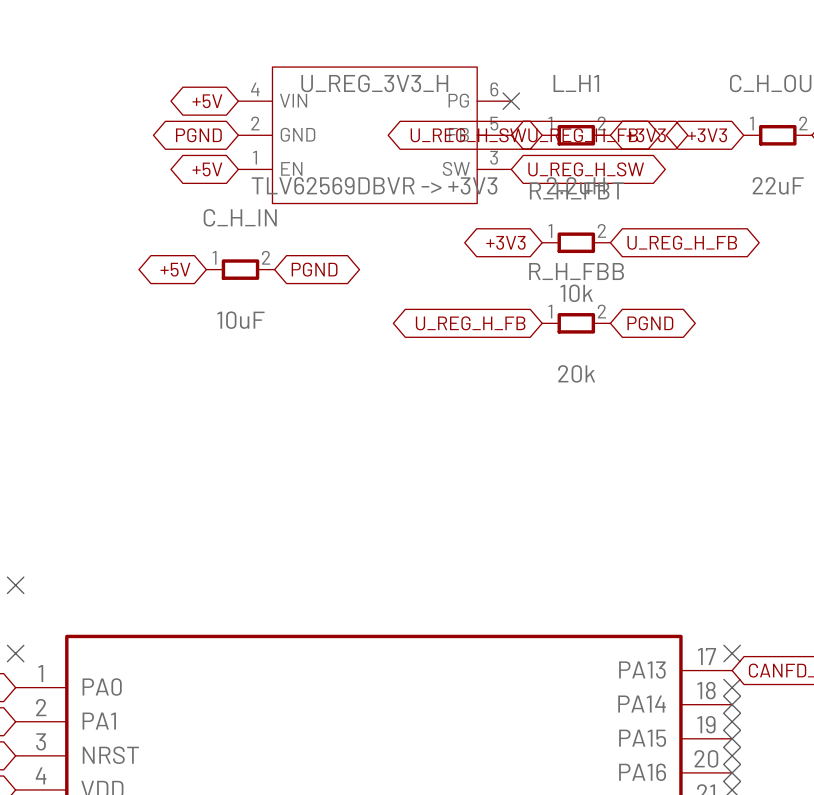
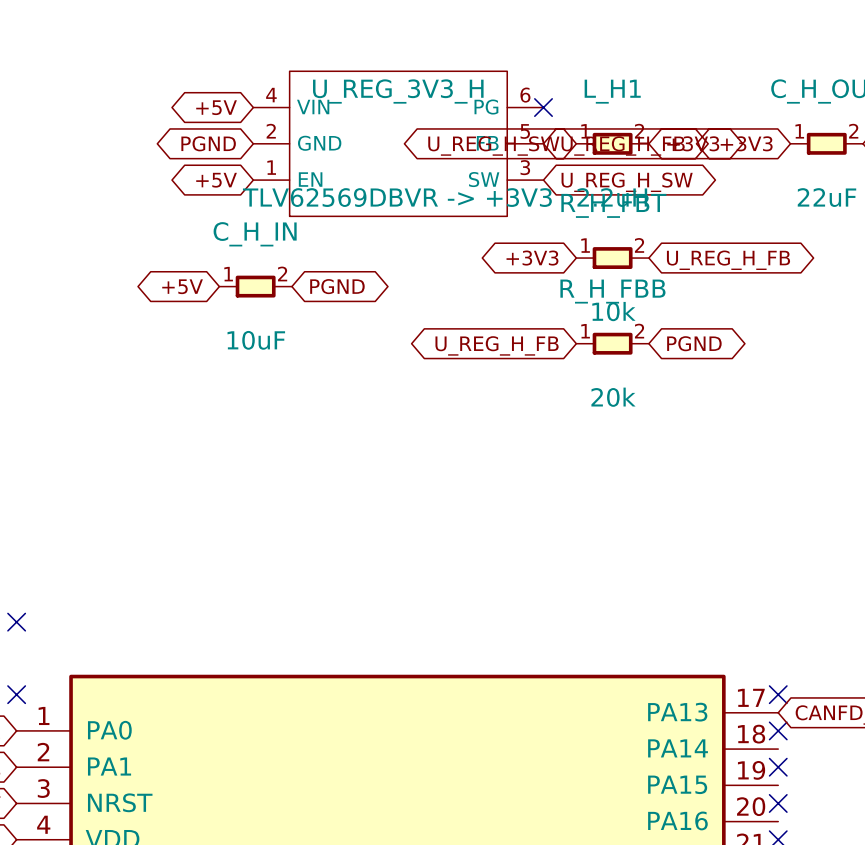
no-connect mark: (732, 704) -> none
no-connect mark: (732, 738) -> none
no-connect mark: (732, 772) -> none

